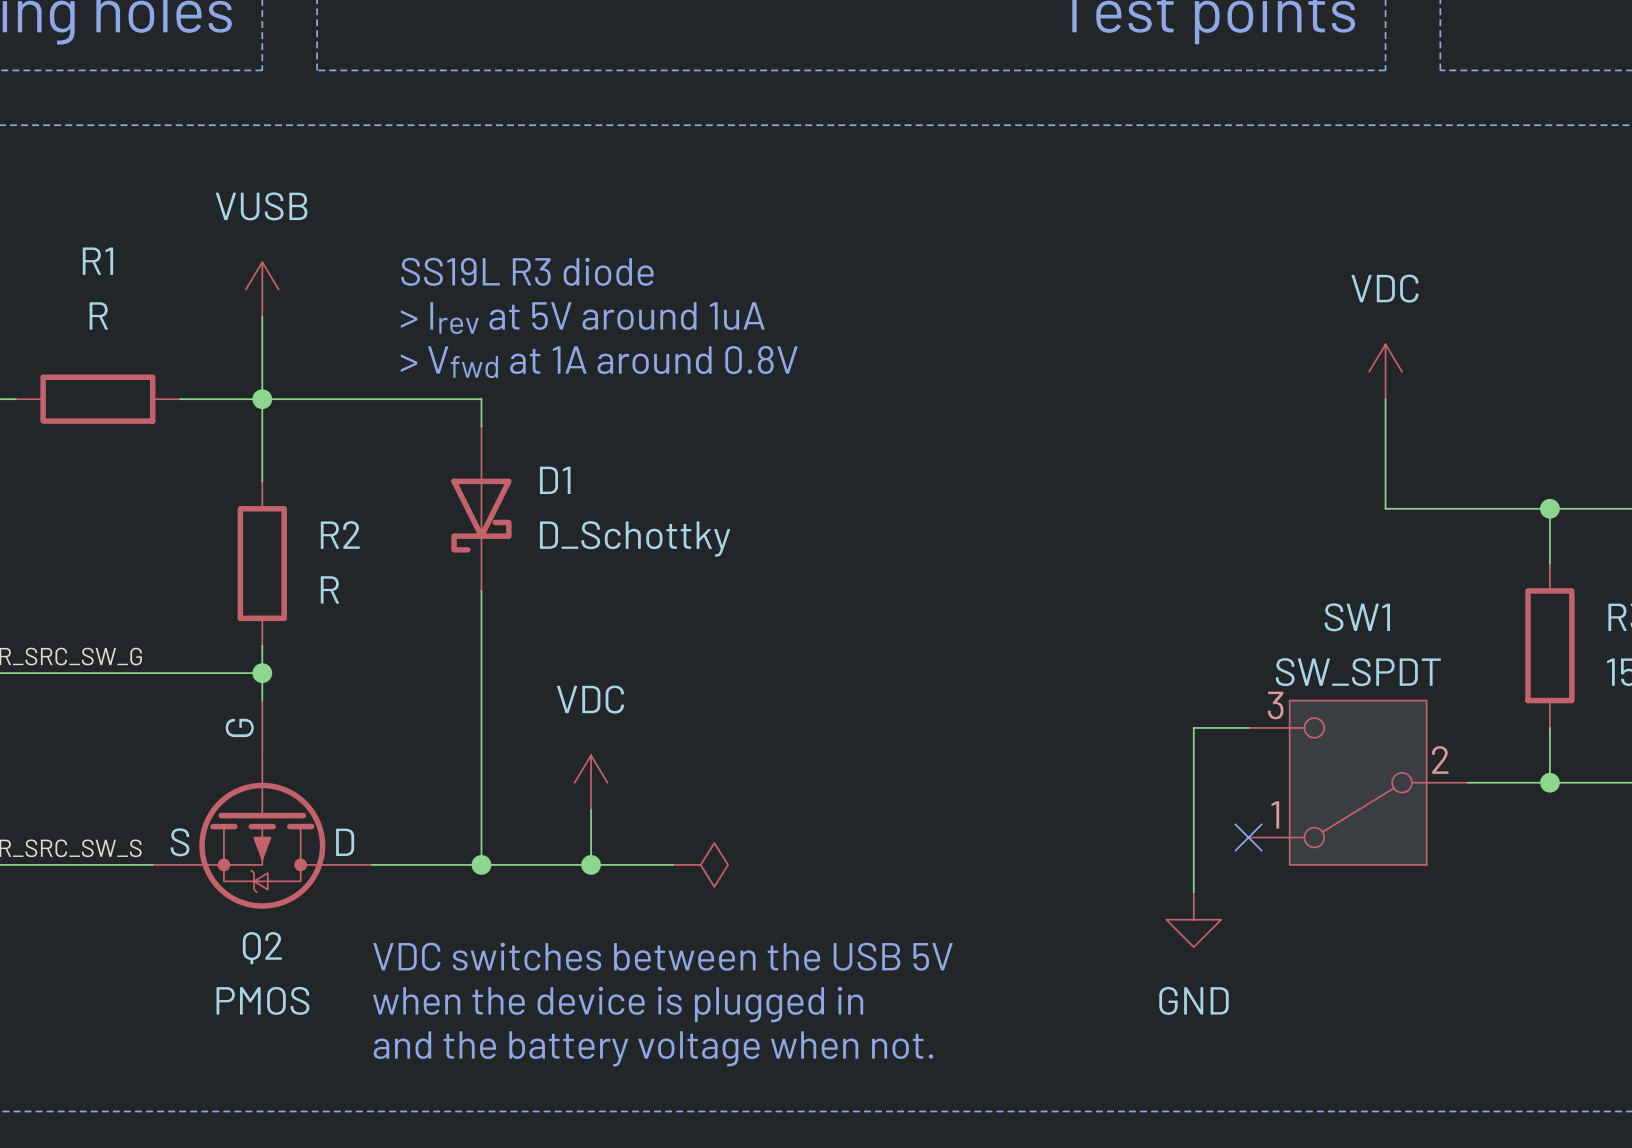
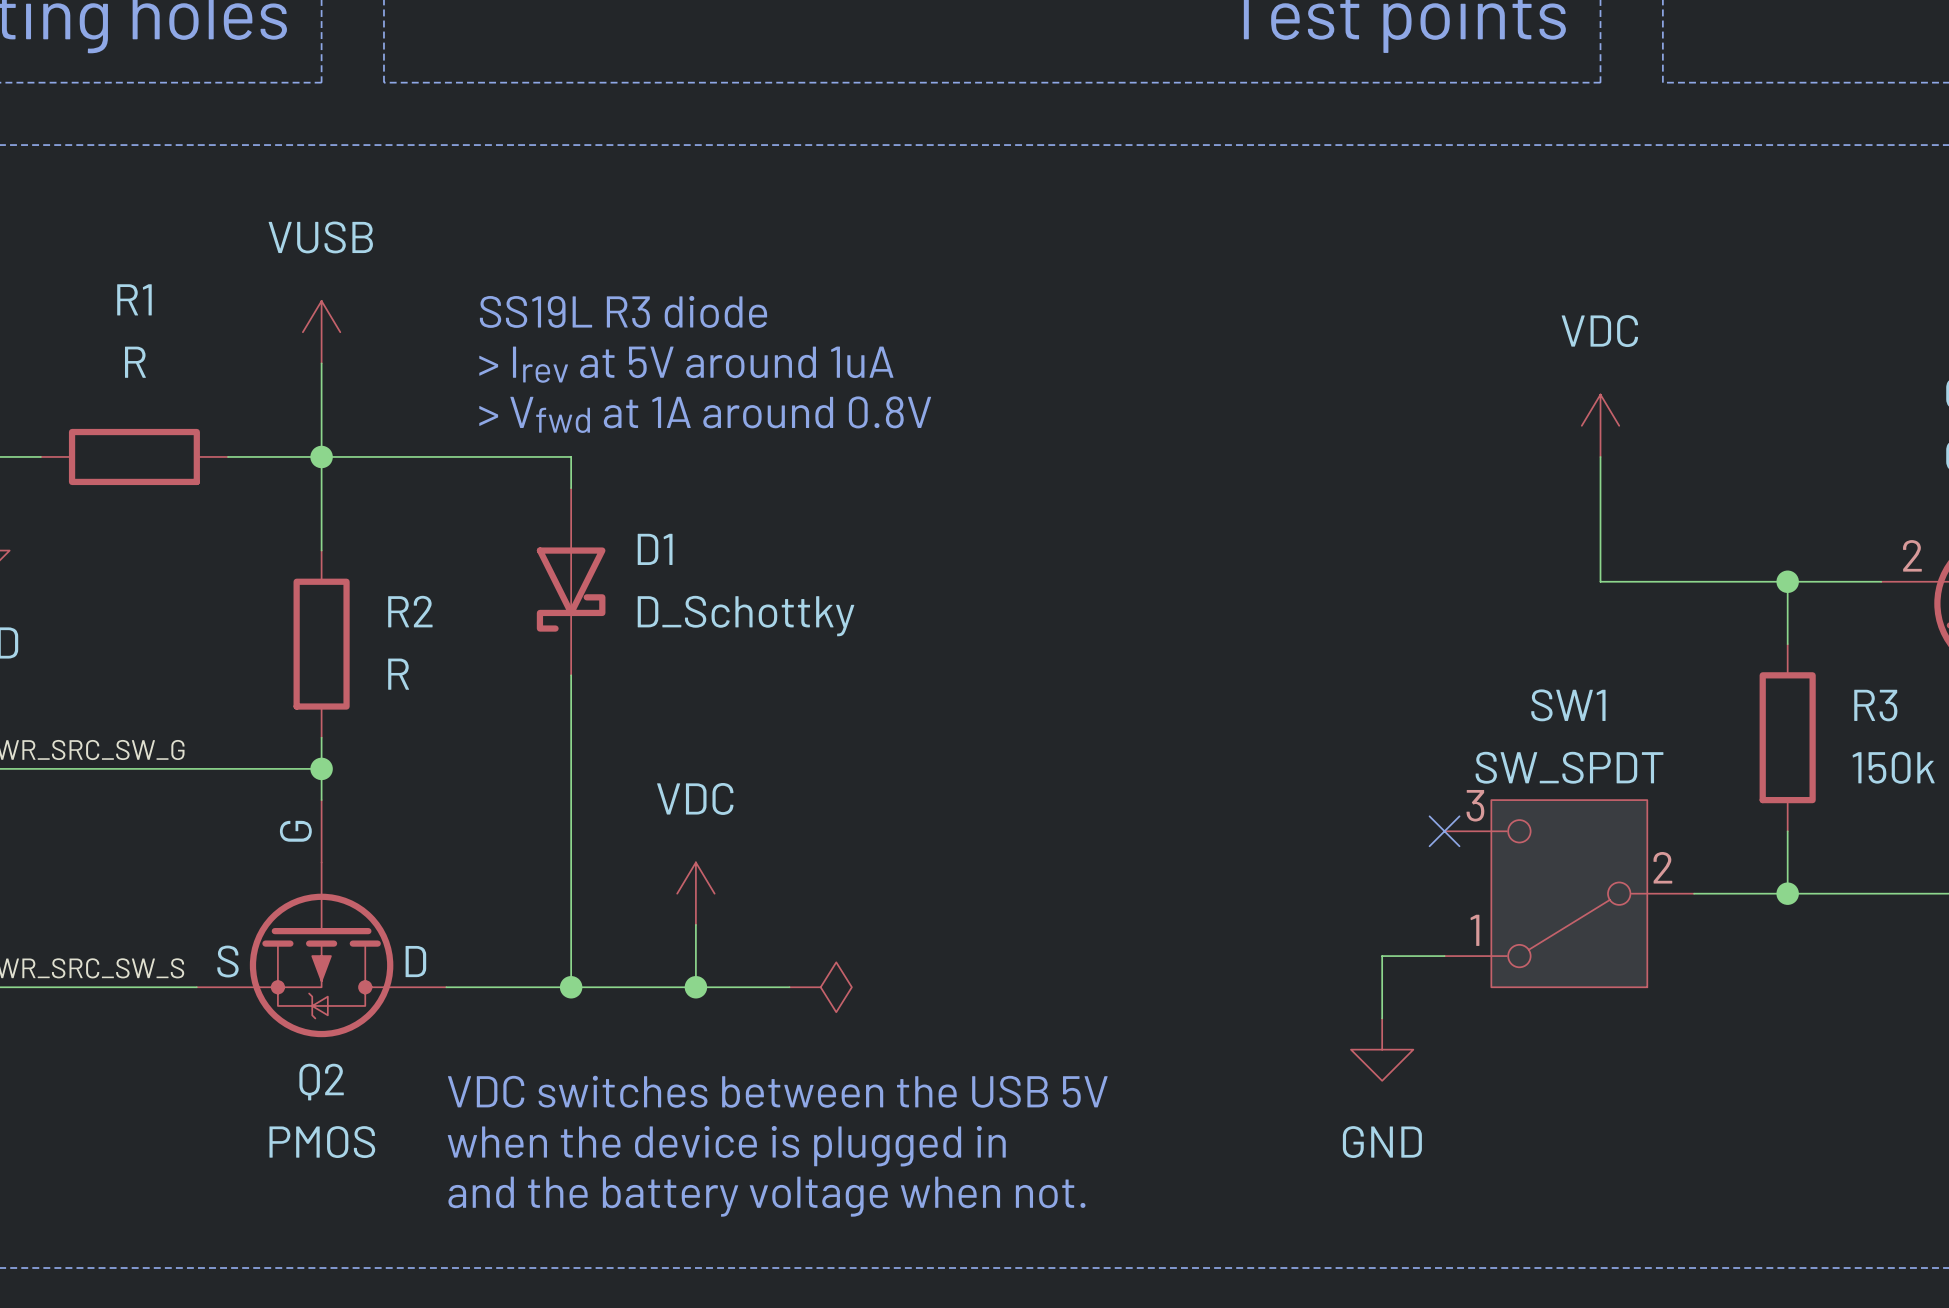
wire: (1248, 727) (1193, 727) (1193, 837) -> (1444, 956) (1382, 956)
no-connect mark position: (1248, 837) -> (1444, 831)

